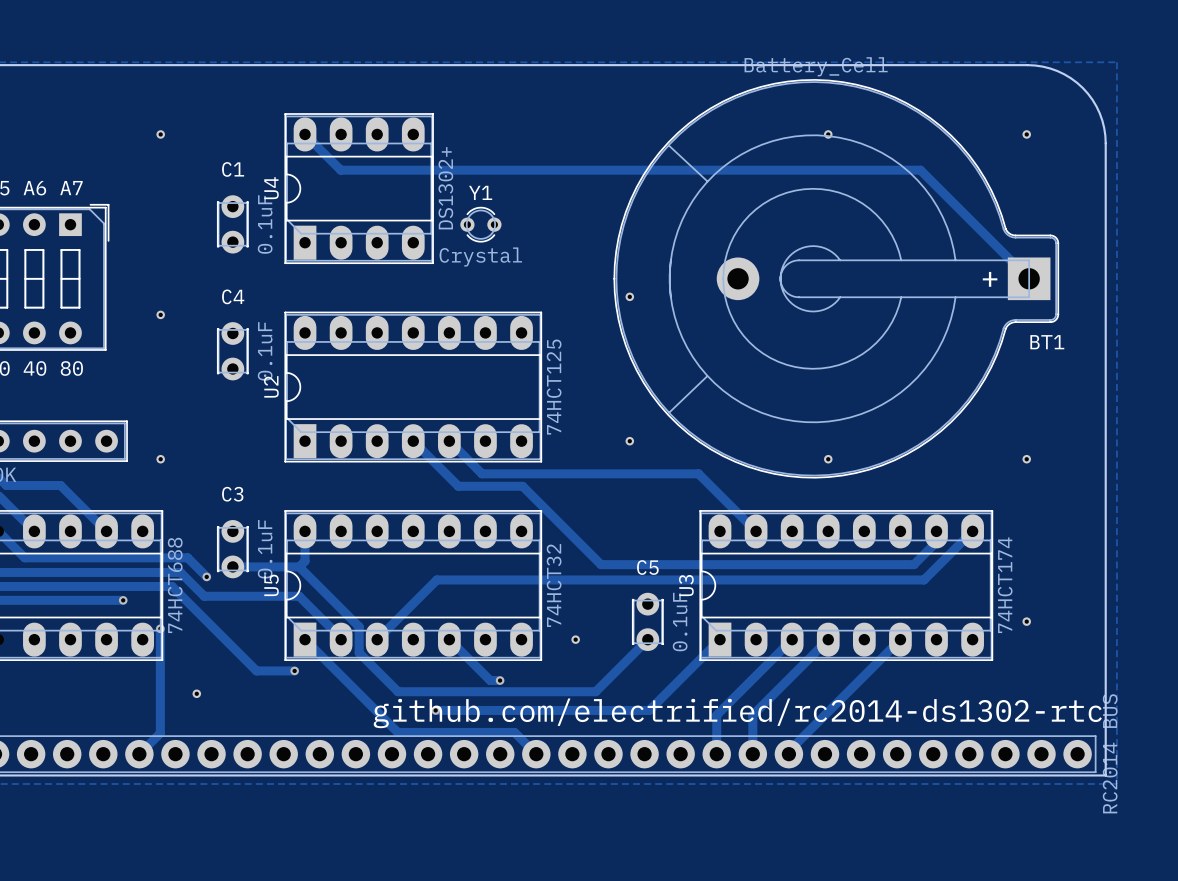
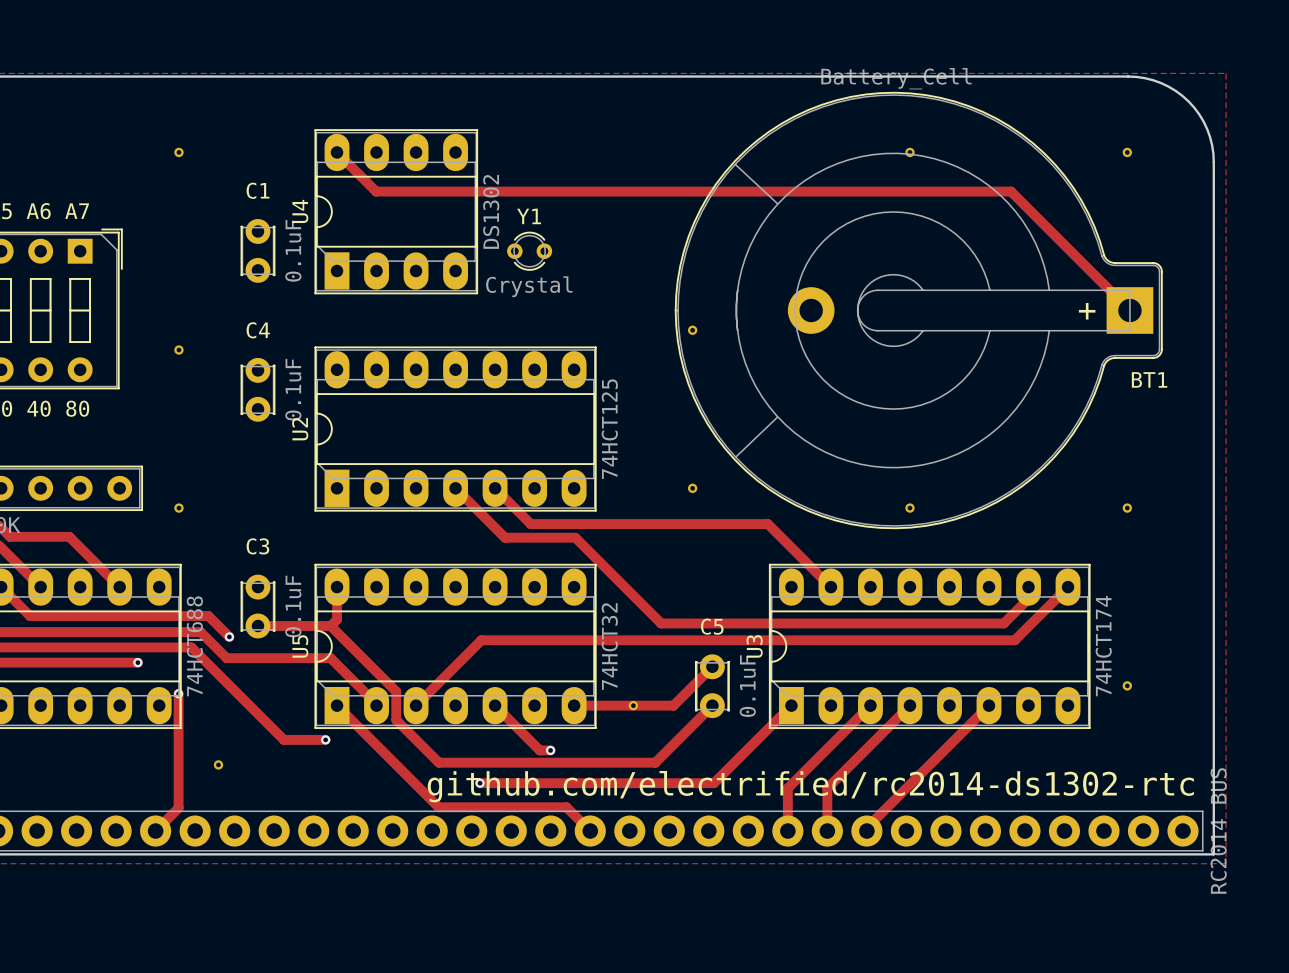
U4 value: DS1302+ (445, 188) -> DS1302 (491, 211)
track: none -> (712, 666) (673, 705) (574, 705)

